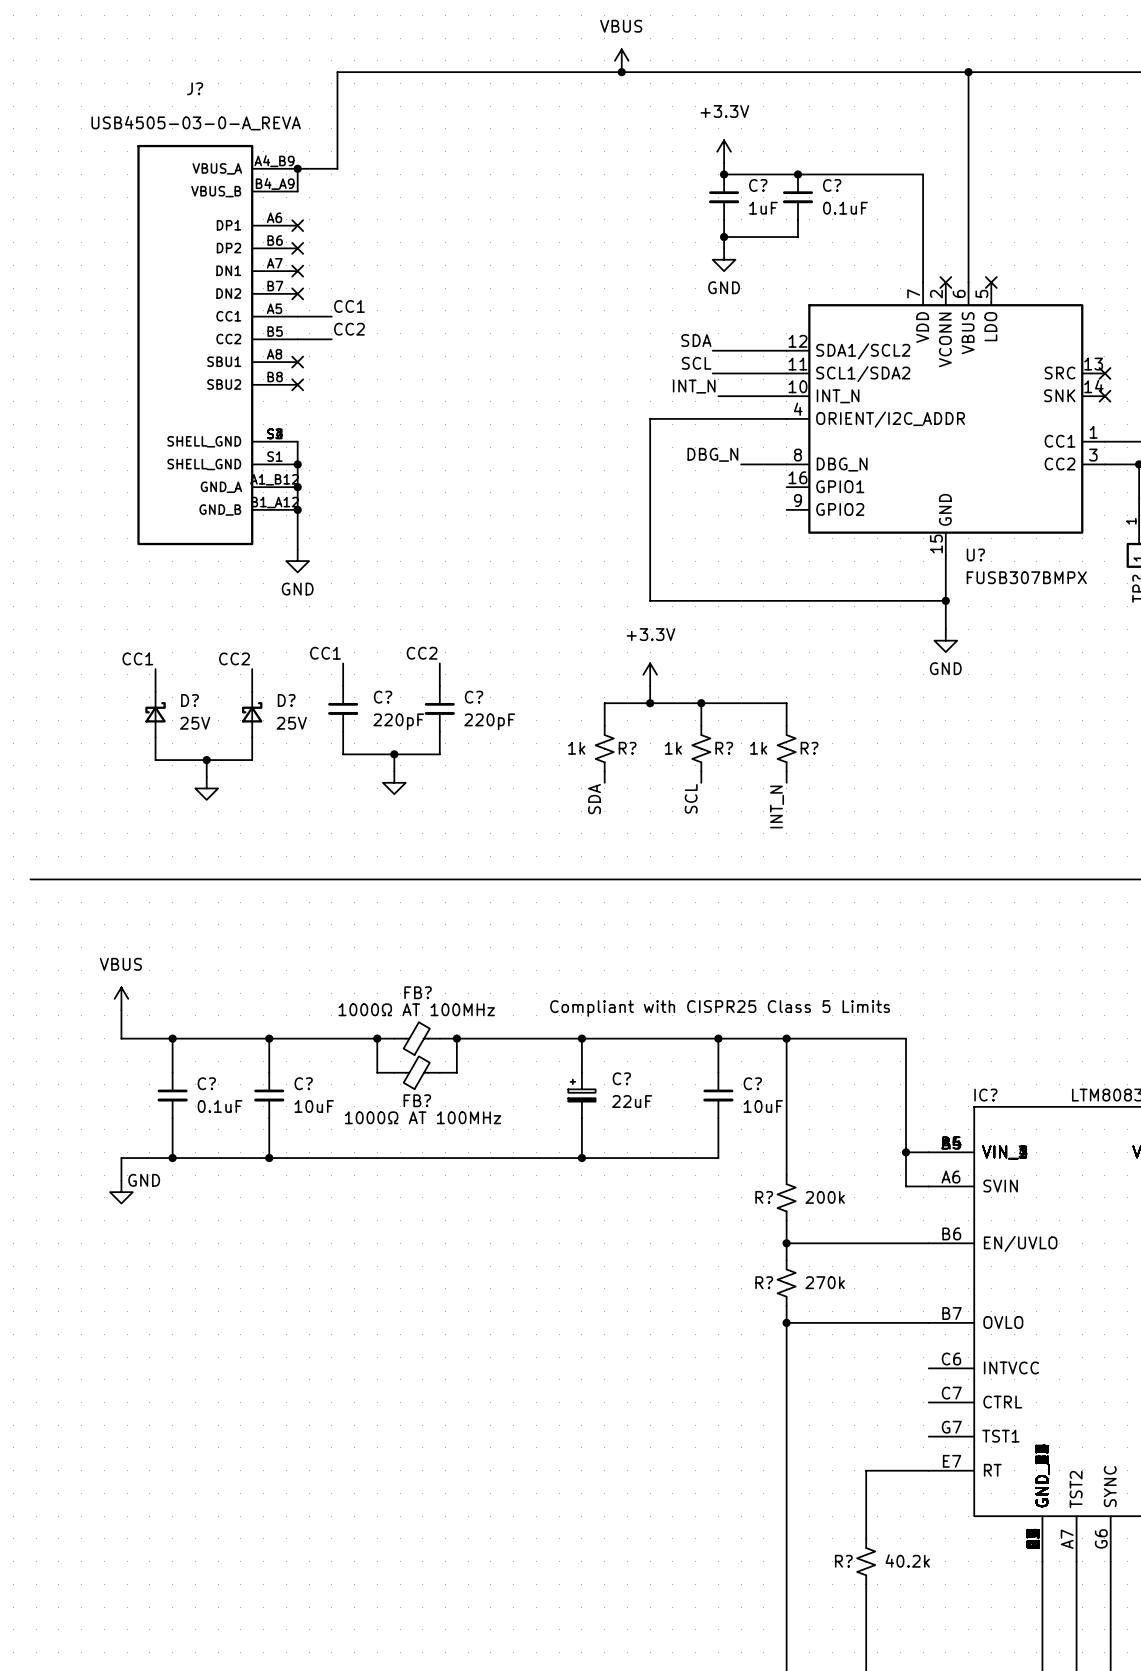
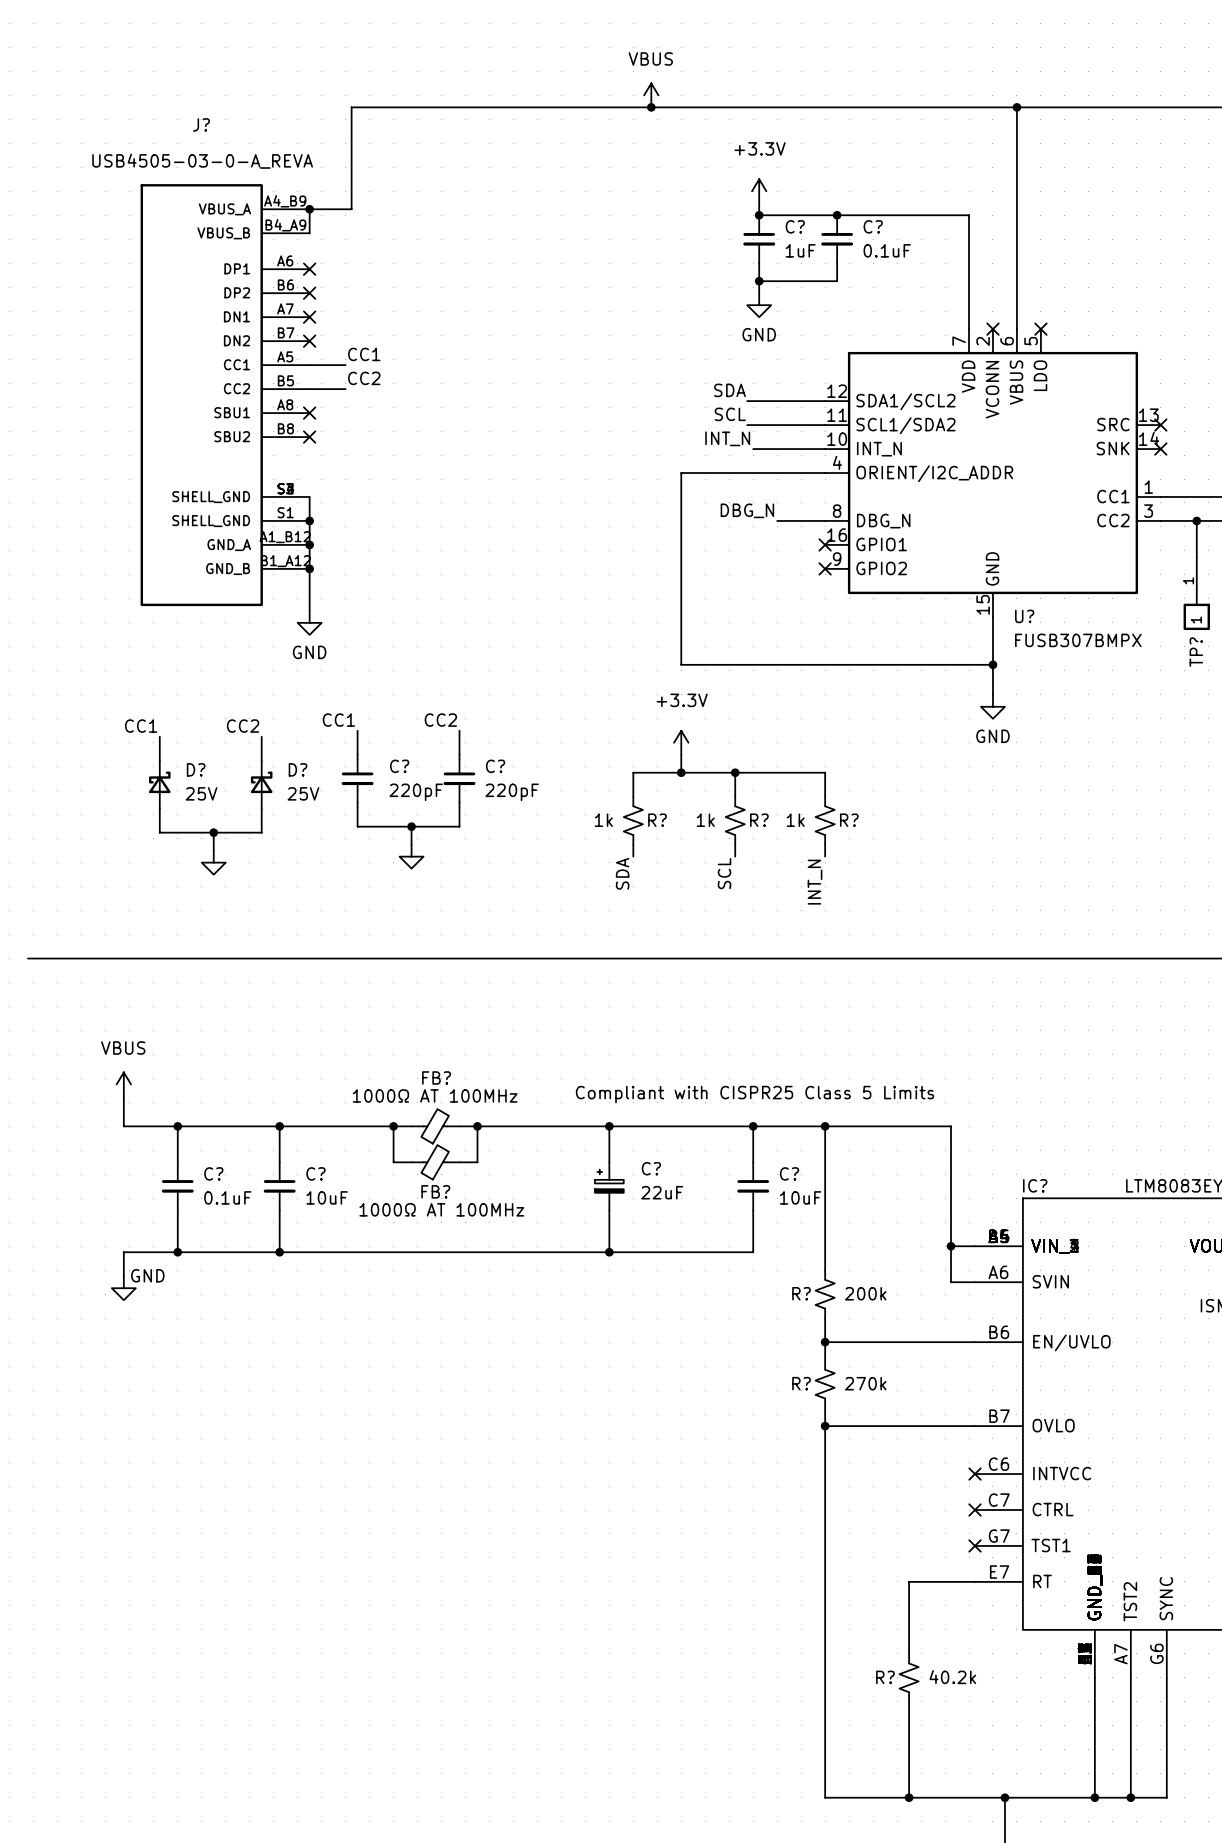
no-connect mark: none -> (825, 544)
no-connect mark: none -> (825, 568)
no-connect mark: none -> (975, 1474)
no-connect mark: none -> (975, 1510)
no-connect mark: none -> (975, 1545)

